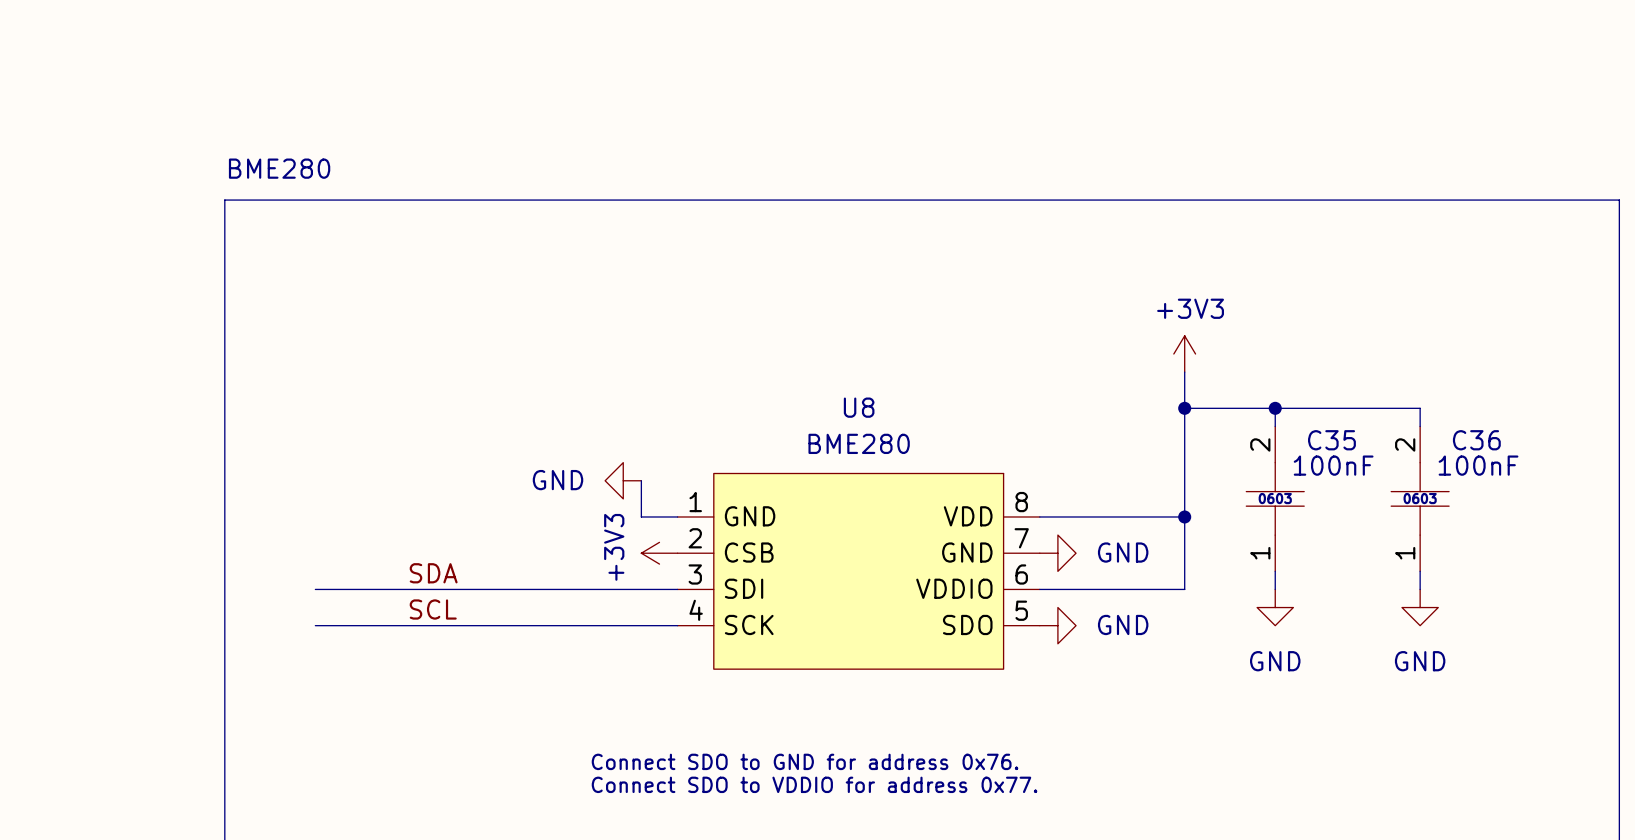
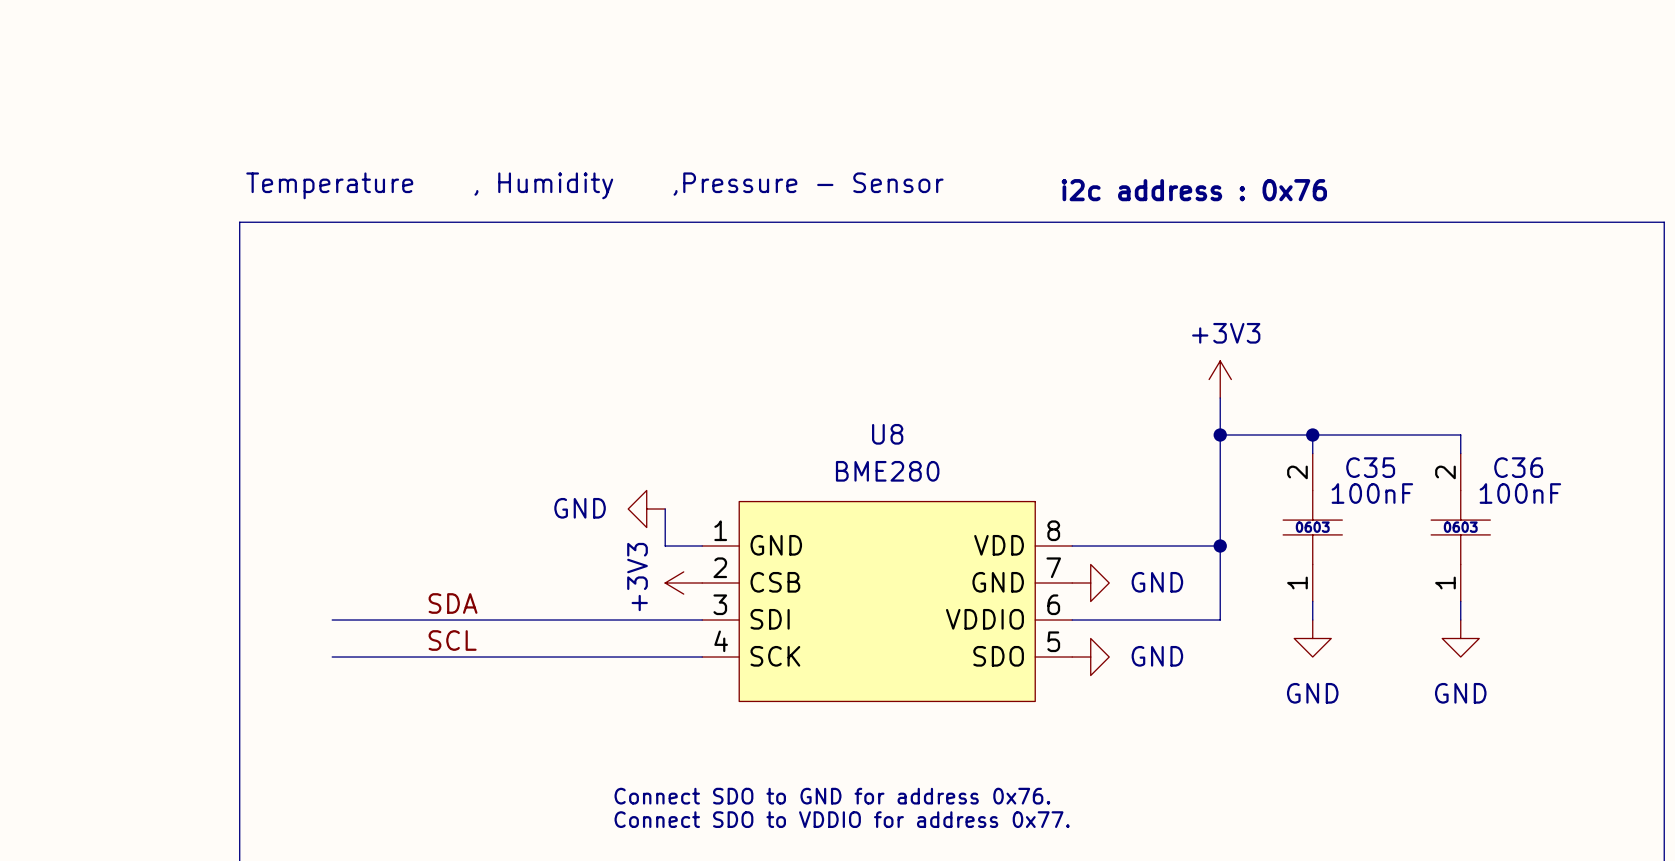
text: none -> Temperature , Humidity ,Pressure - Sensor (594, 185)
text: BME280 (279, 168) -> none
text: none -> i2c address : 0x76 (1194, 190)

